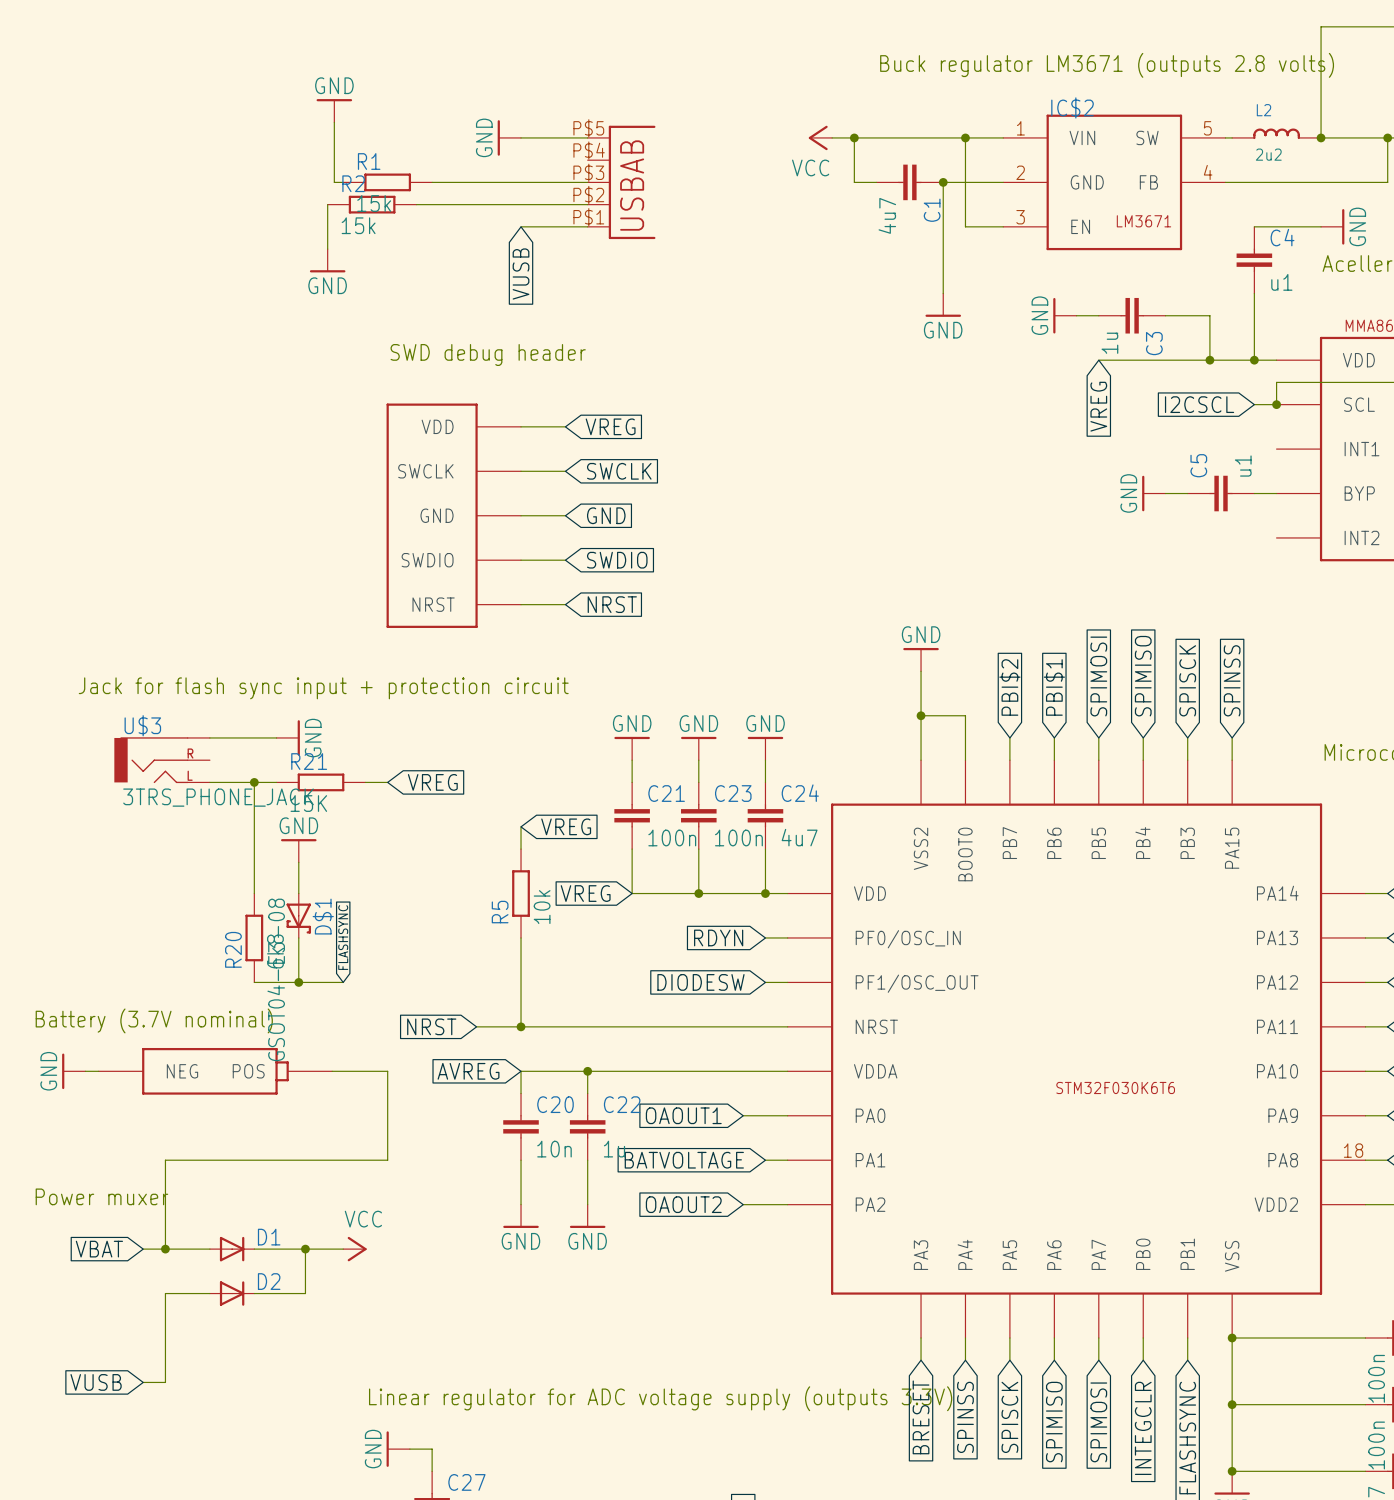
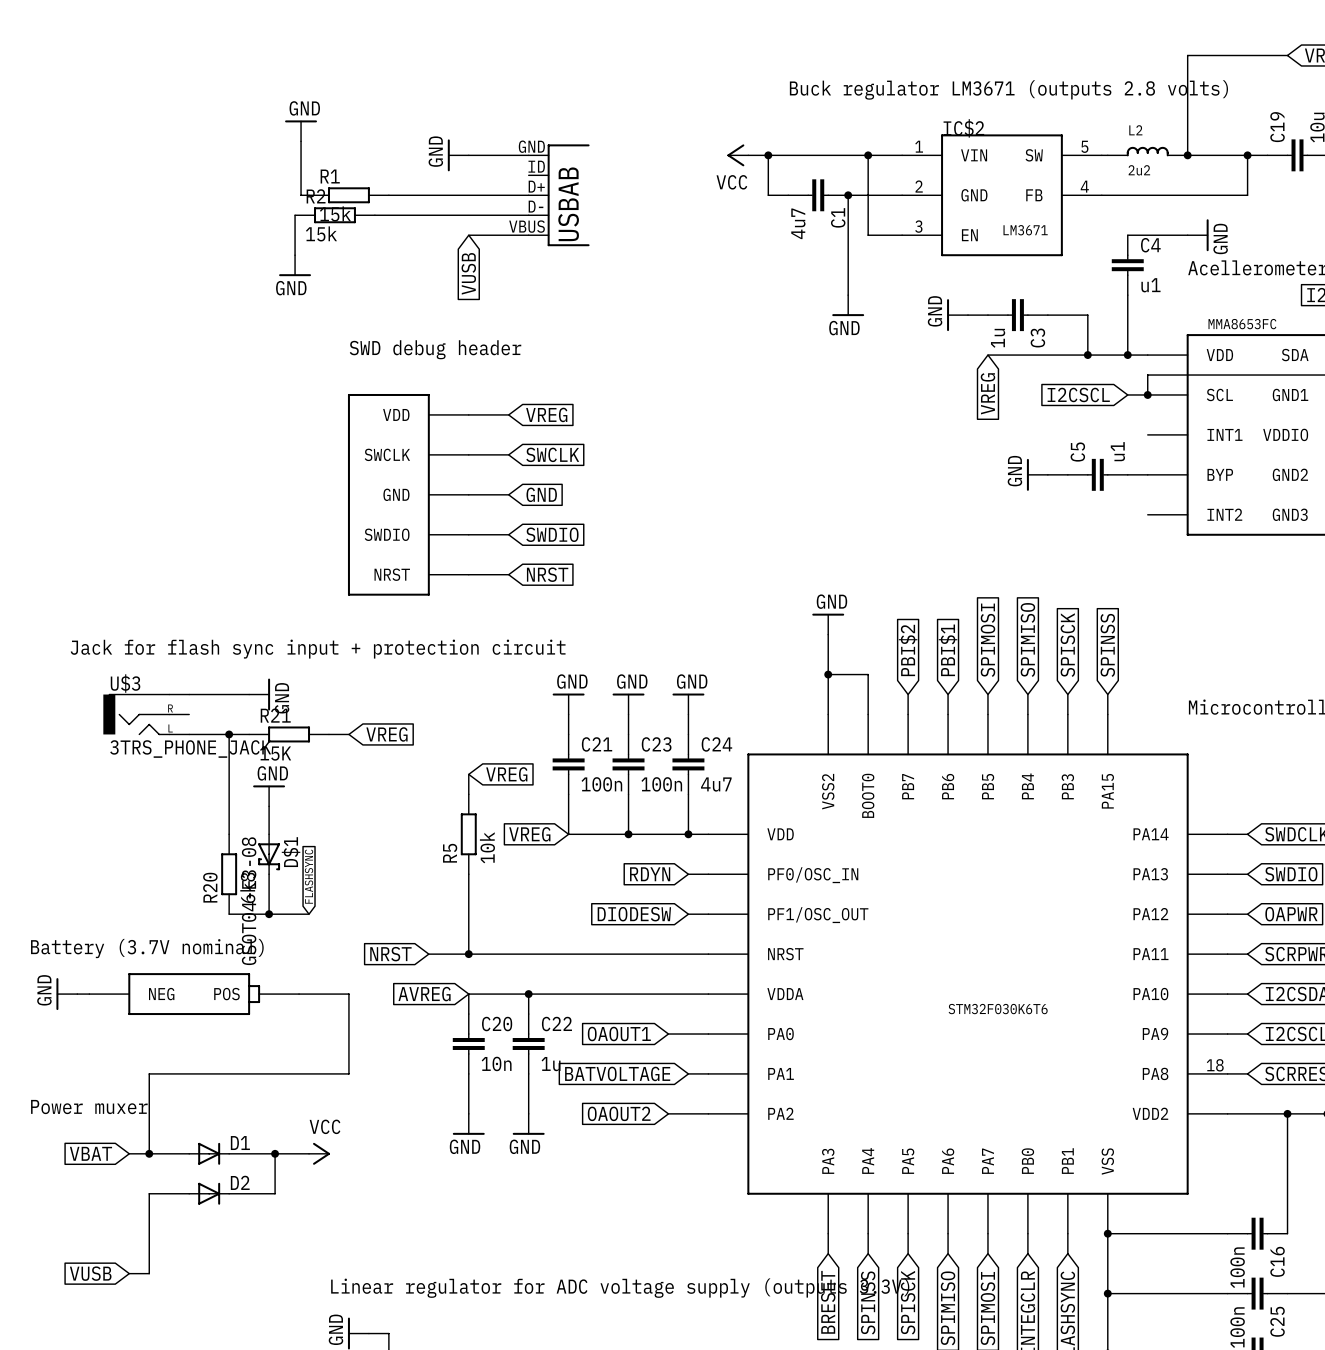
part pin number: P$5 (588, 128) -> GND (531, 146)
part pin number: P$4 (589, 150) -> ID (536, 166)
part pin number: P$3 (588, 172) -> D+ (536, 186)
part pin number: P$2 (588, 195) -> D- (536, 206)
part pin number: P$1 (588, 217) -> VBUS (527, 226)

